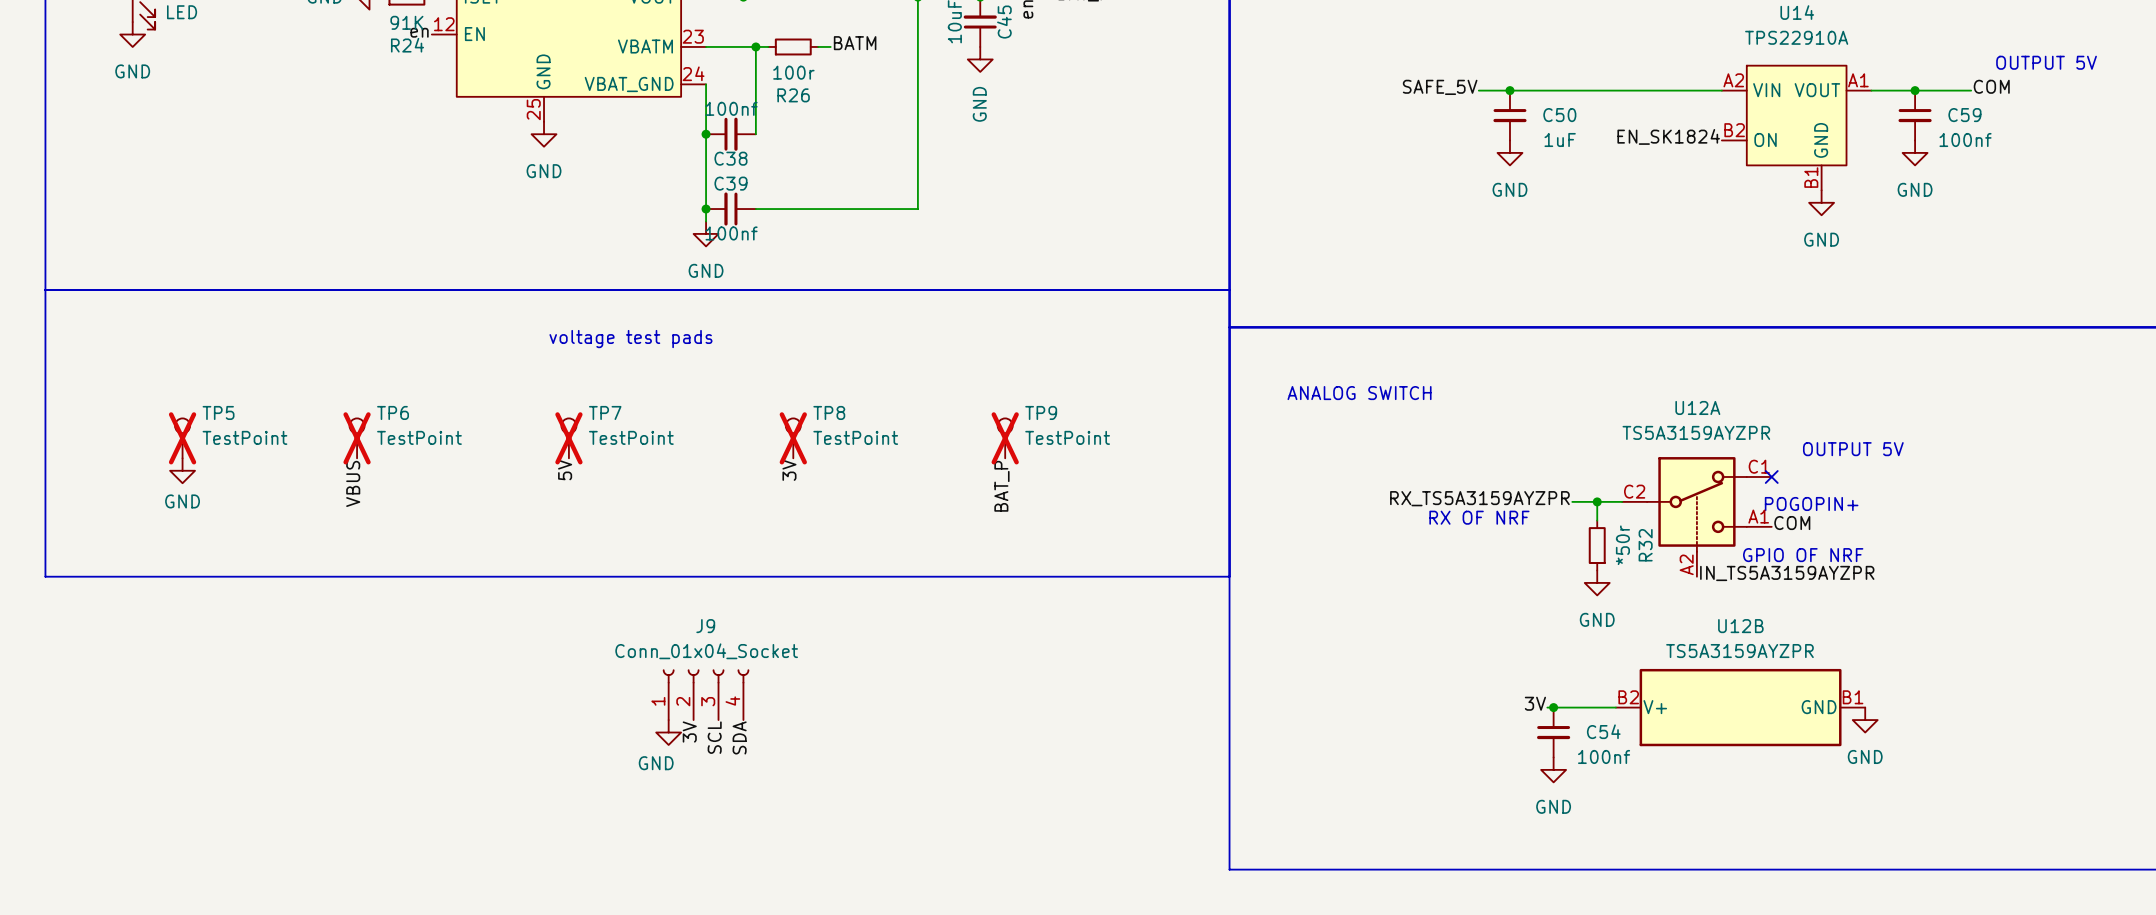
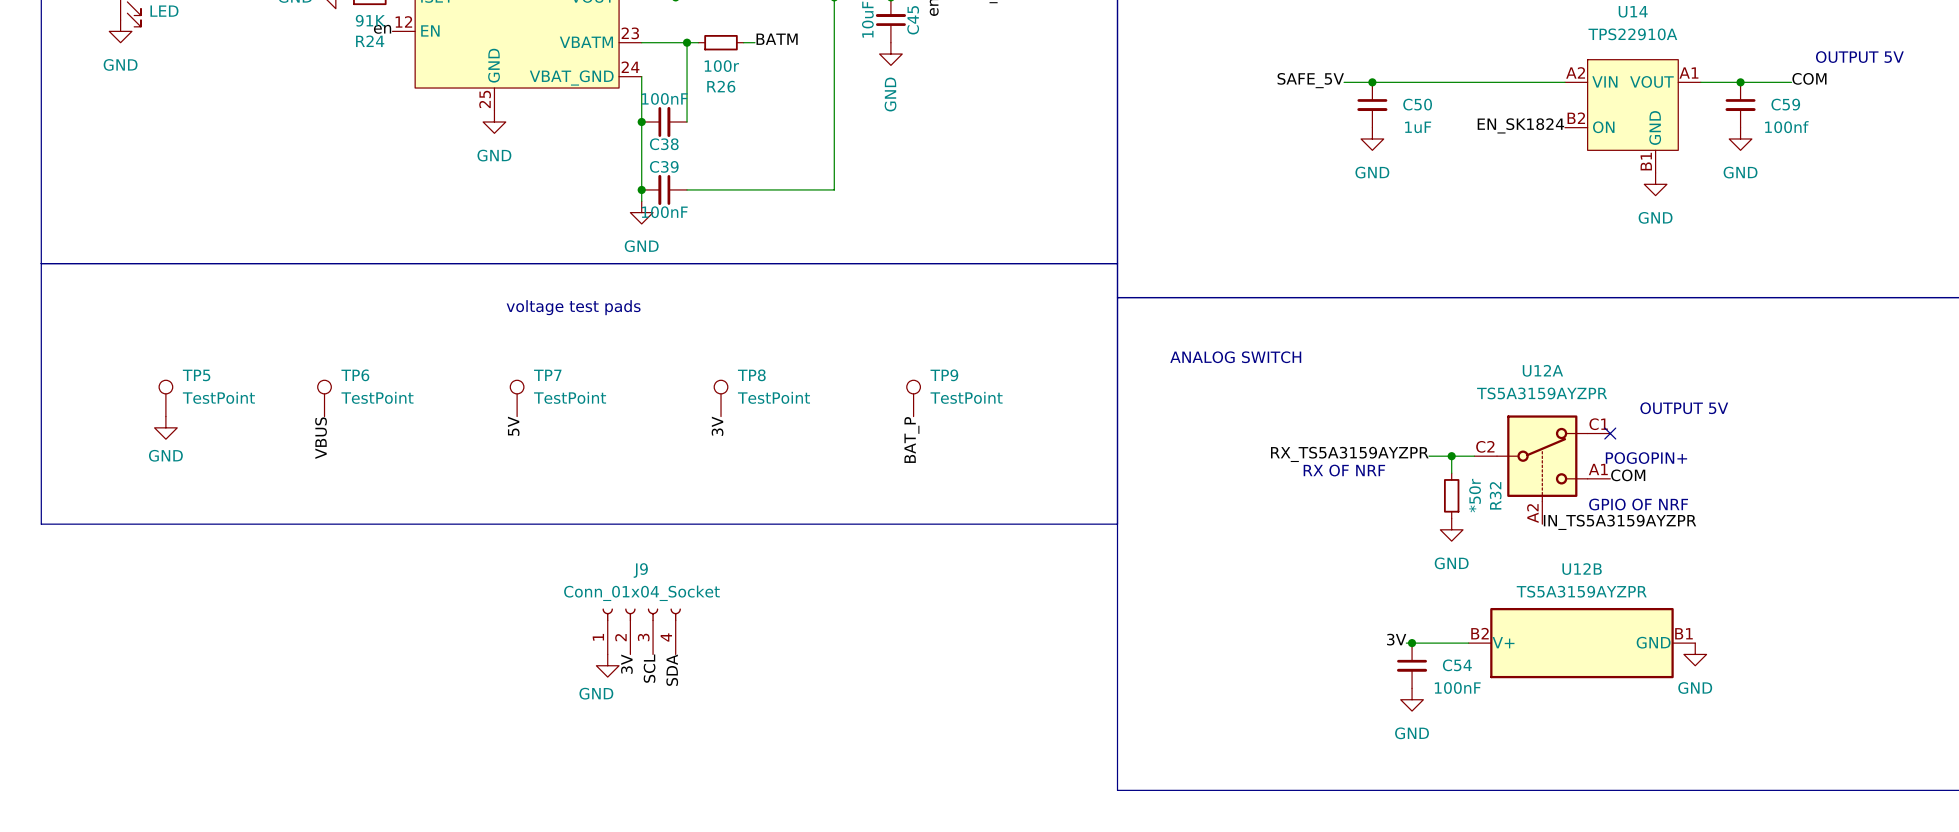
C38 value: 100nf (731, 108) -> 100nF (664, 98)
C39 value: 100nf (731, 233) -> 100nF (664, 212)
TP5 do-not-place cross: (182, 438) -> none
TP6 do-not-place cross: (357, 438) -> none
TP7 do-not-place cross: (568, 438) -> none
TP8 do-not-place cross: (793, 438) -> none
TP9 do-not-place cross: (1005, 438) -> none
C54 value: 100nf (1604, 756) -> 100nF (1457, 688)

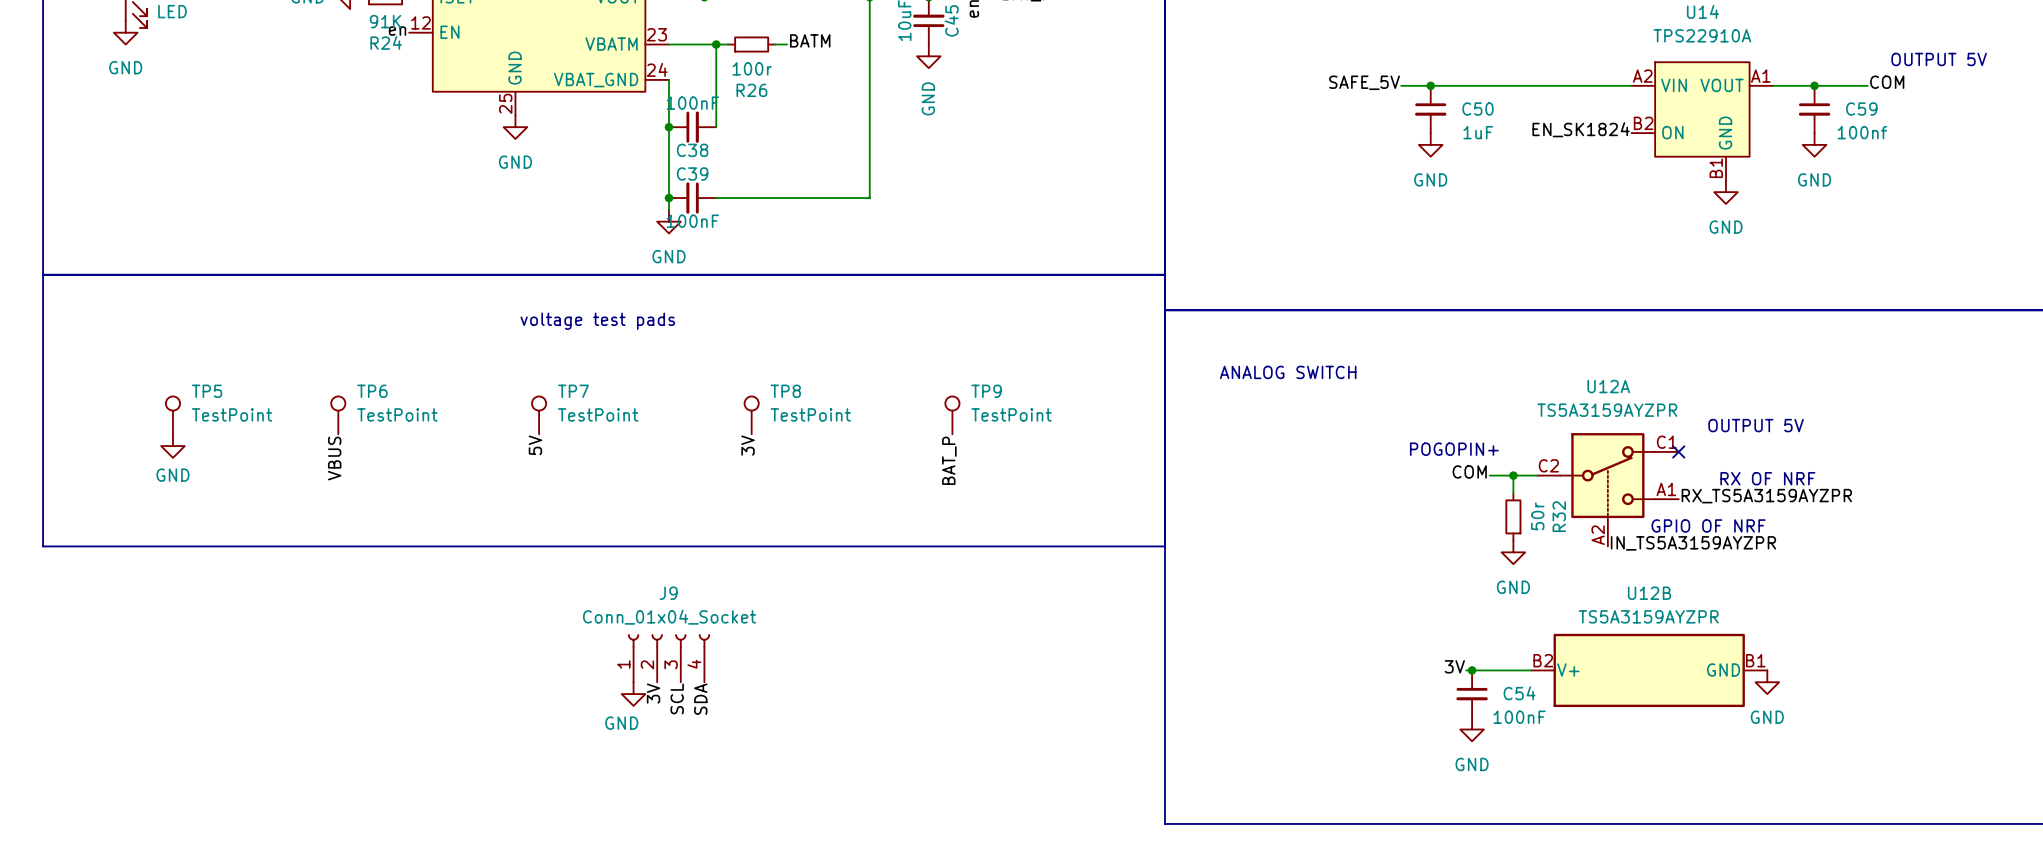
text: none -> POGOPIN+ (1454, 449)
label: RX_TS5A3159AYZPR (1349, 454) -> COM (1469, 471)
text: POGOPIN+ (1646, 458) -> none
text: none -> RX OF NRF (1767, 478)
text: RX OF NRF (1344, 470) -> none
label: COM (1628, 475) -> RX_TS5A3159AYZPR (1766, 496)
R32 value: *50r (1475, 495) -> 50r (1537, 516)

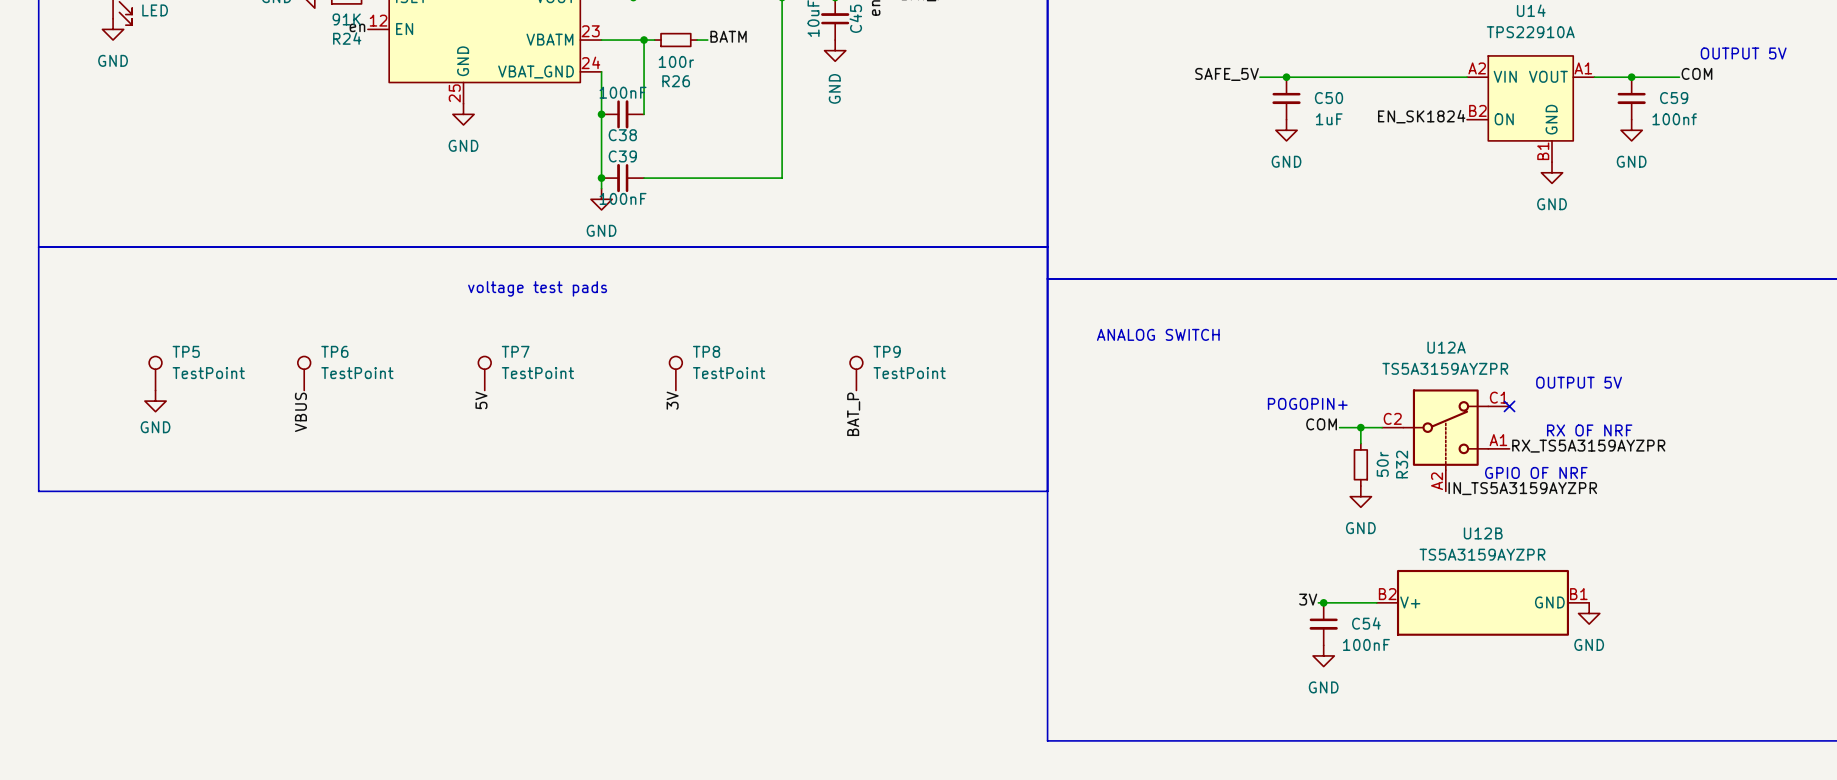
J9: Conn_01x04_Socket (668, 658) -> none
label: 3V (653, 693) -> none
power symbol: GND (633, 694) -> none
label: SCL (677, 698) -> none
label: SDA (700, 699) -> none

